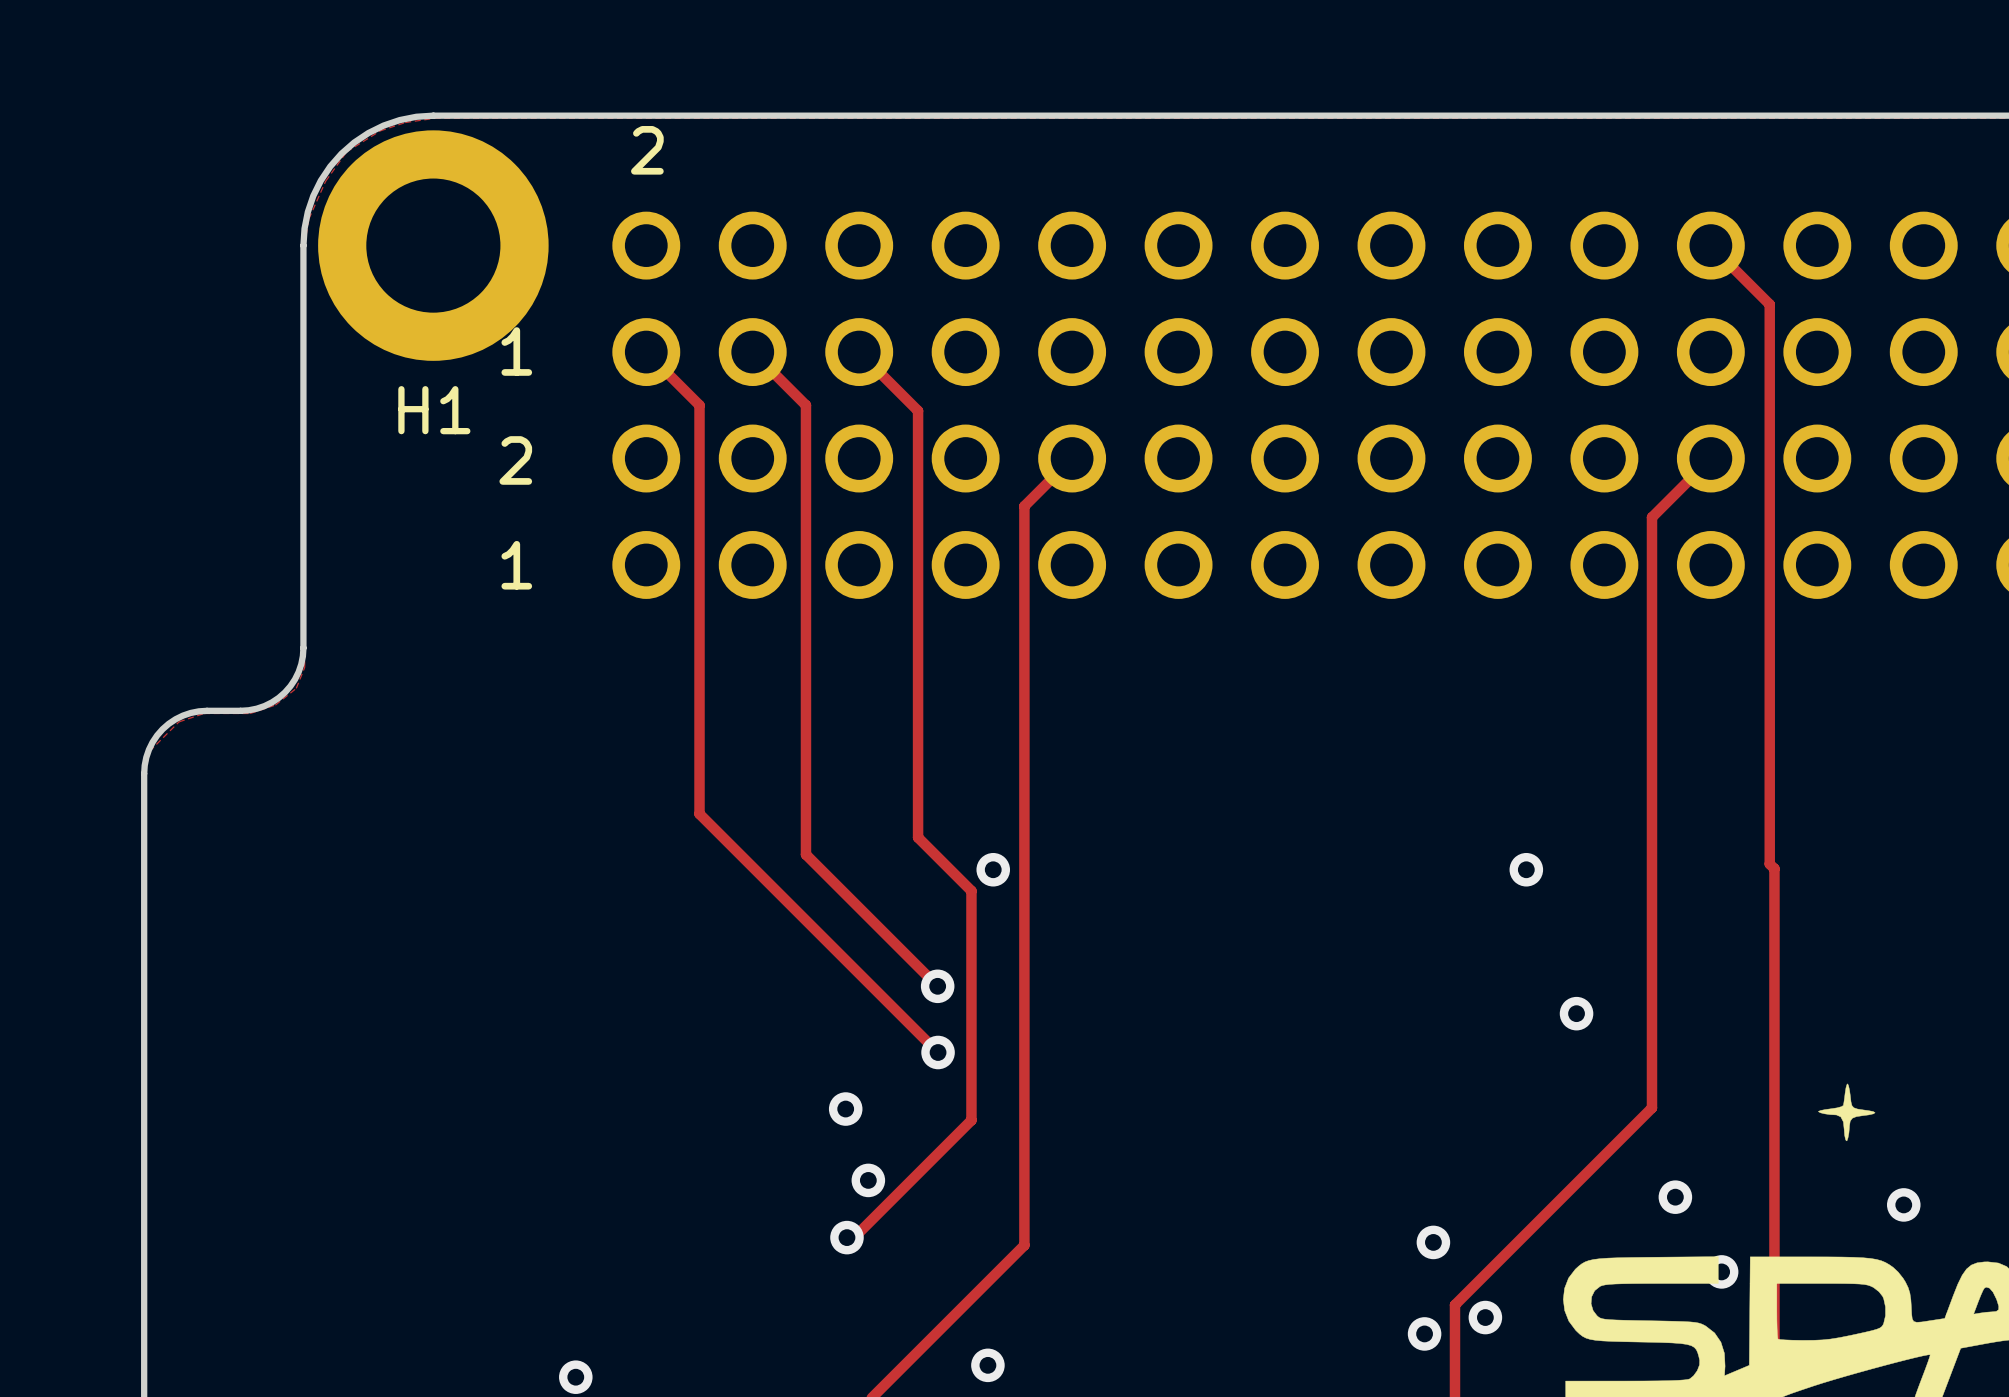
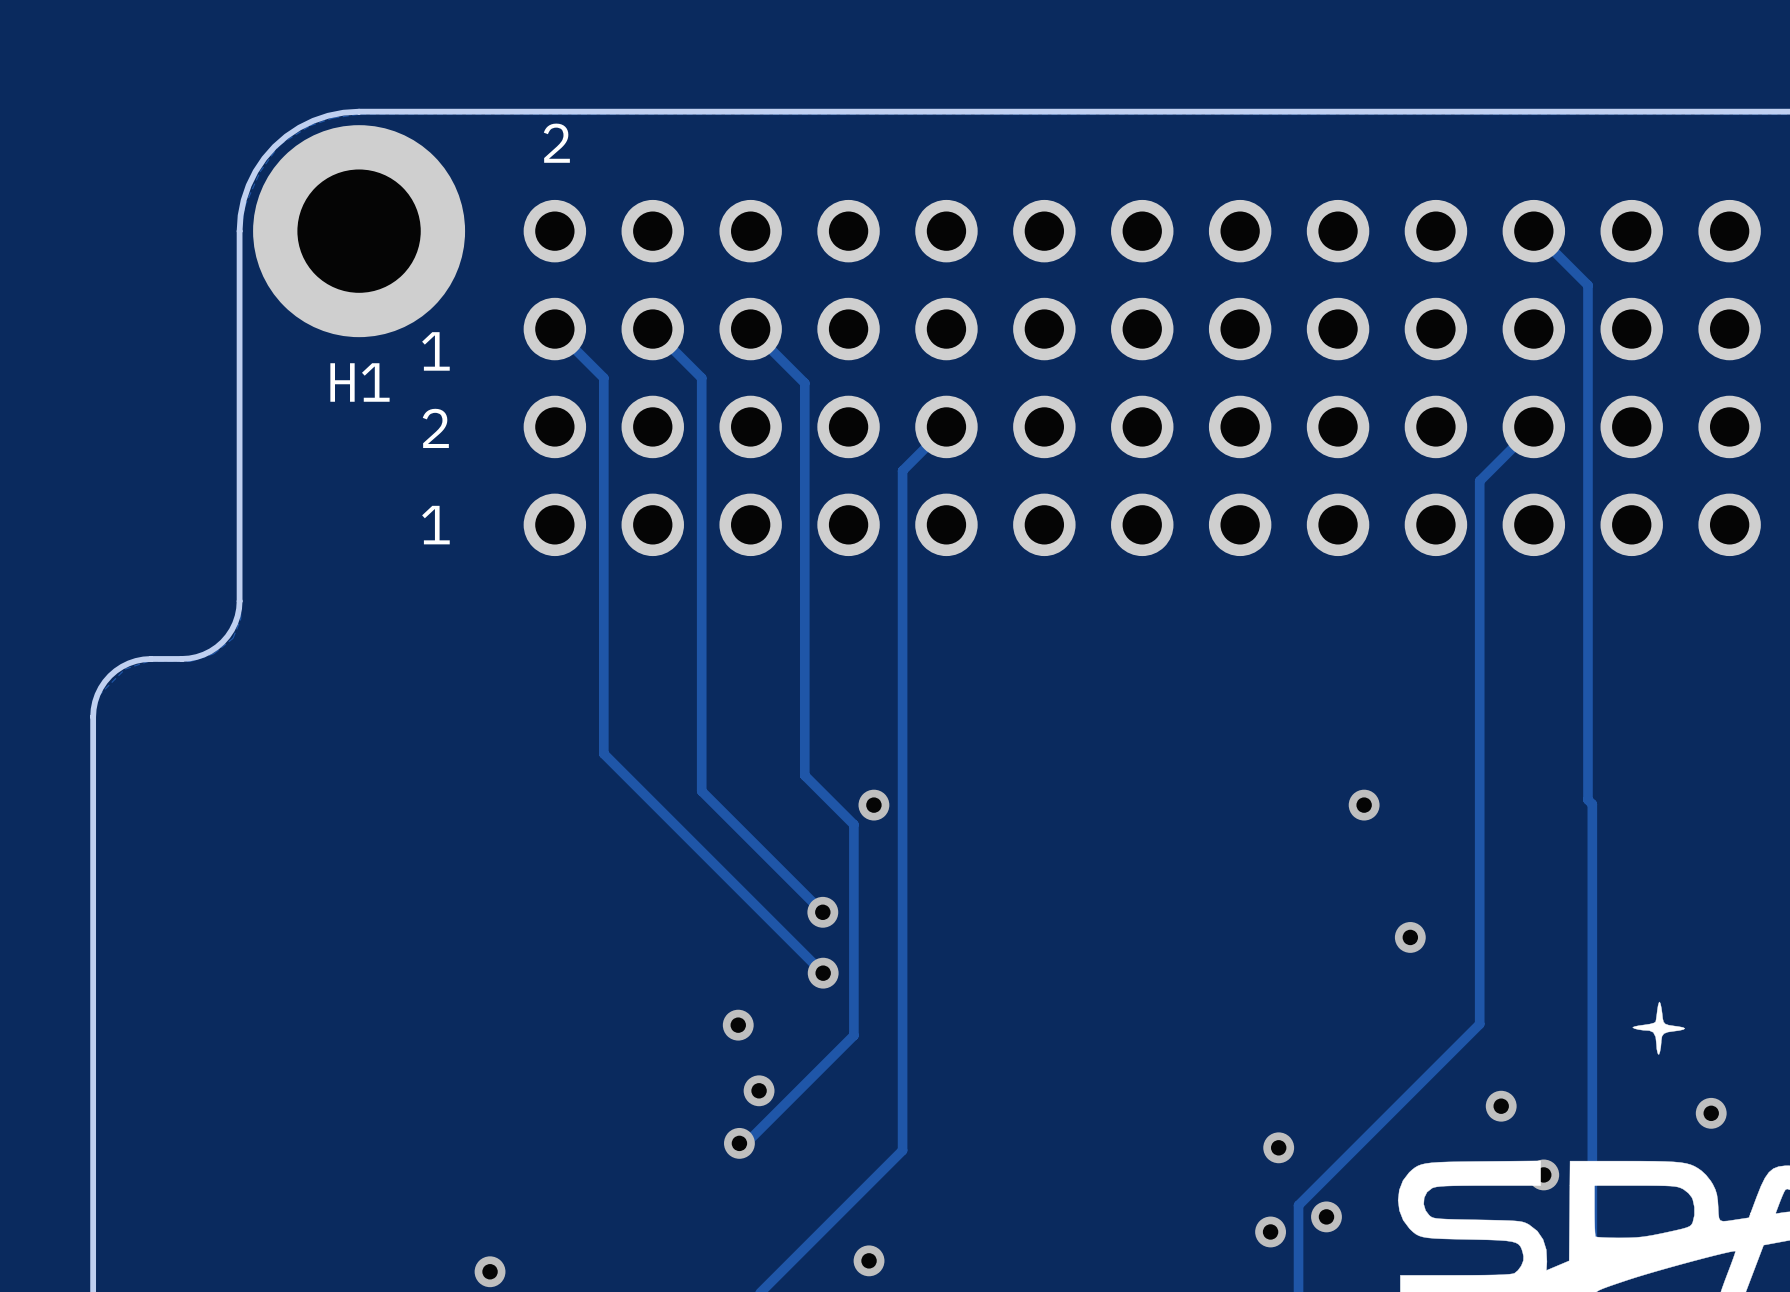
part text position: 1 (516, 351) -> 1 (435, 351)

